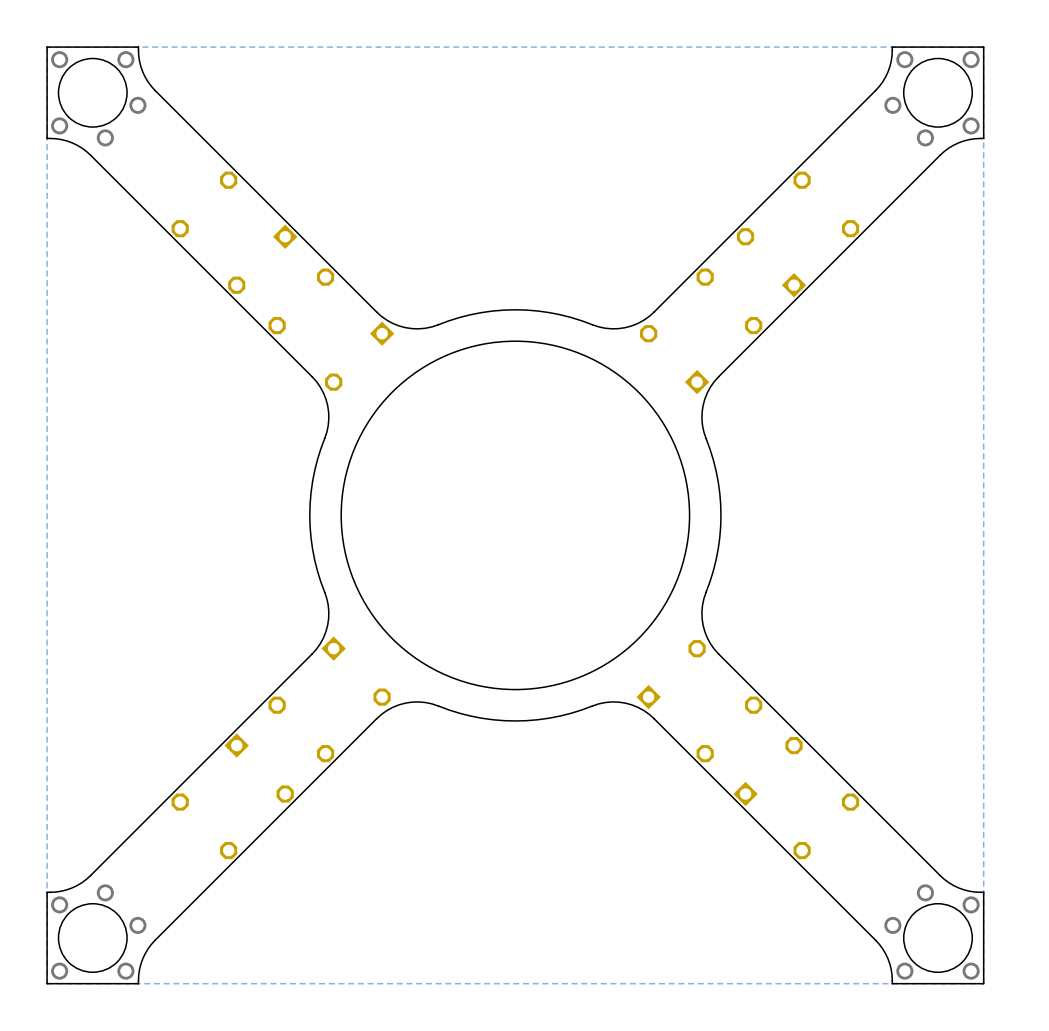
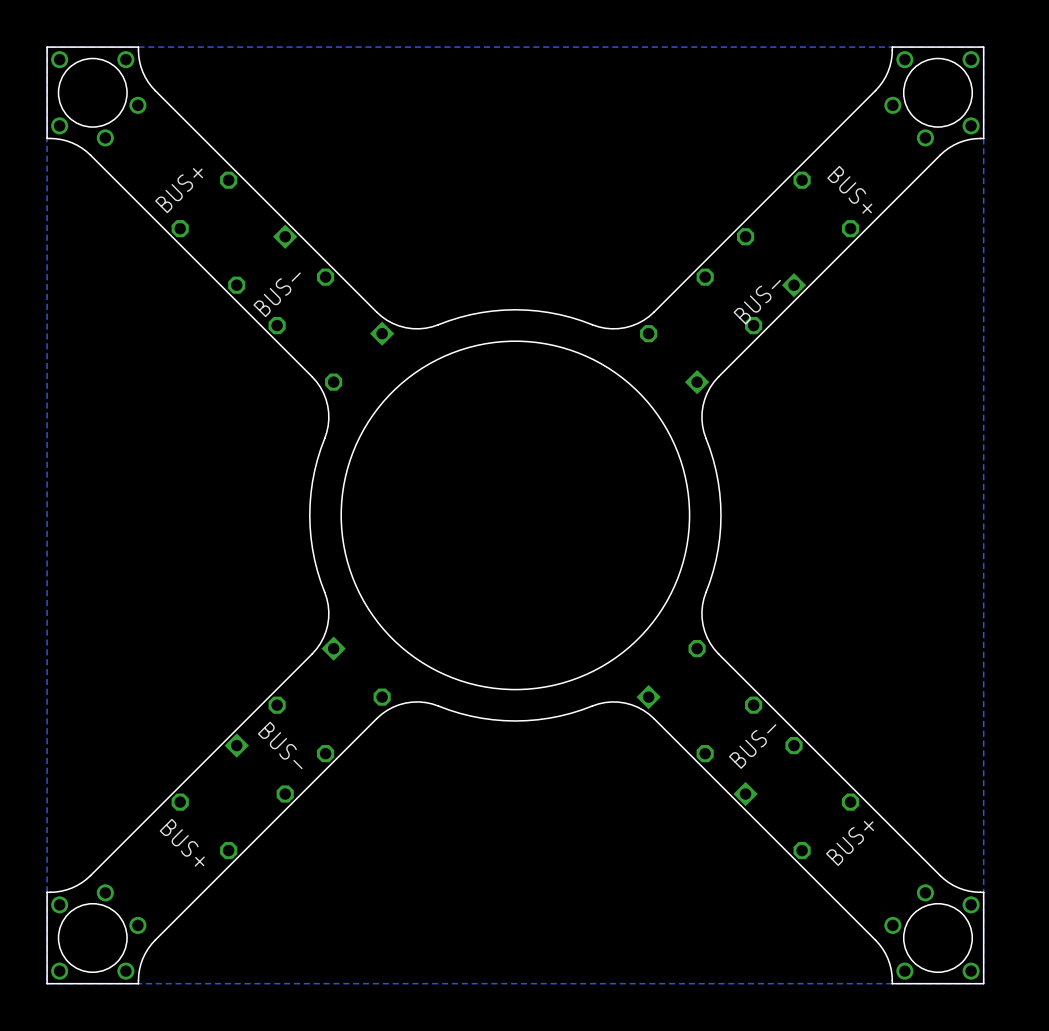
text: none -> BUS+ (849, 189)
text: none -> BUS+ (179, 190)
text: none -> BUS- (277, 294)
text: none -> BUS- (757, 302)
text: none -> BUS- (280, 745)
text: none -> BUS- (752, 746)
text: none -> BUS+ (182, 842)
text: none -> BUS+ (850, 843)

